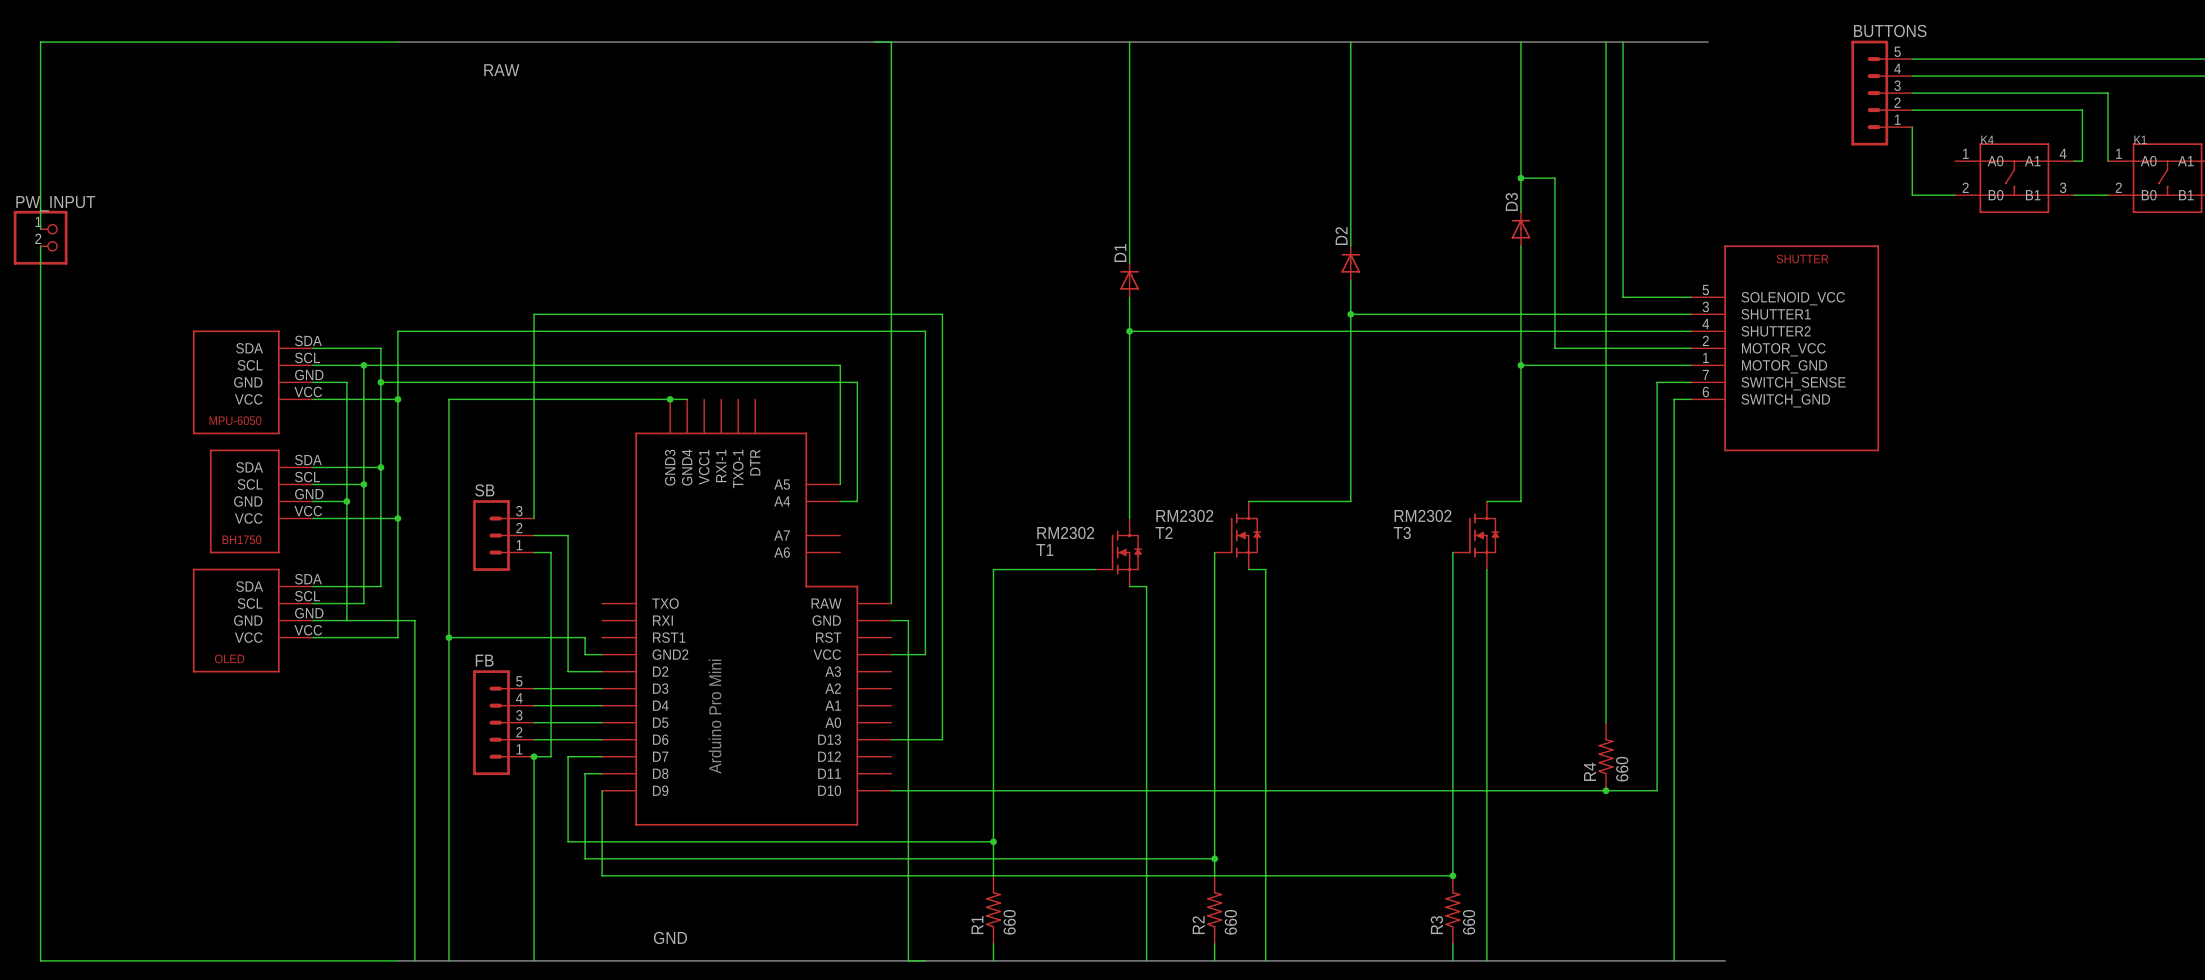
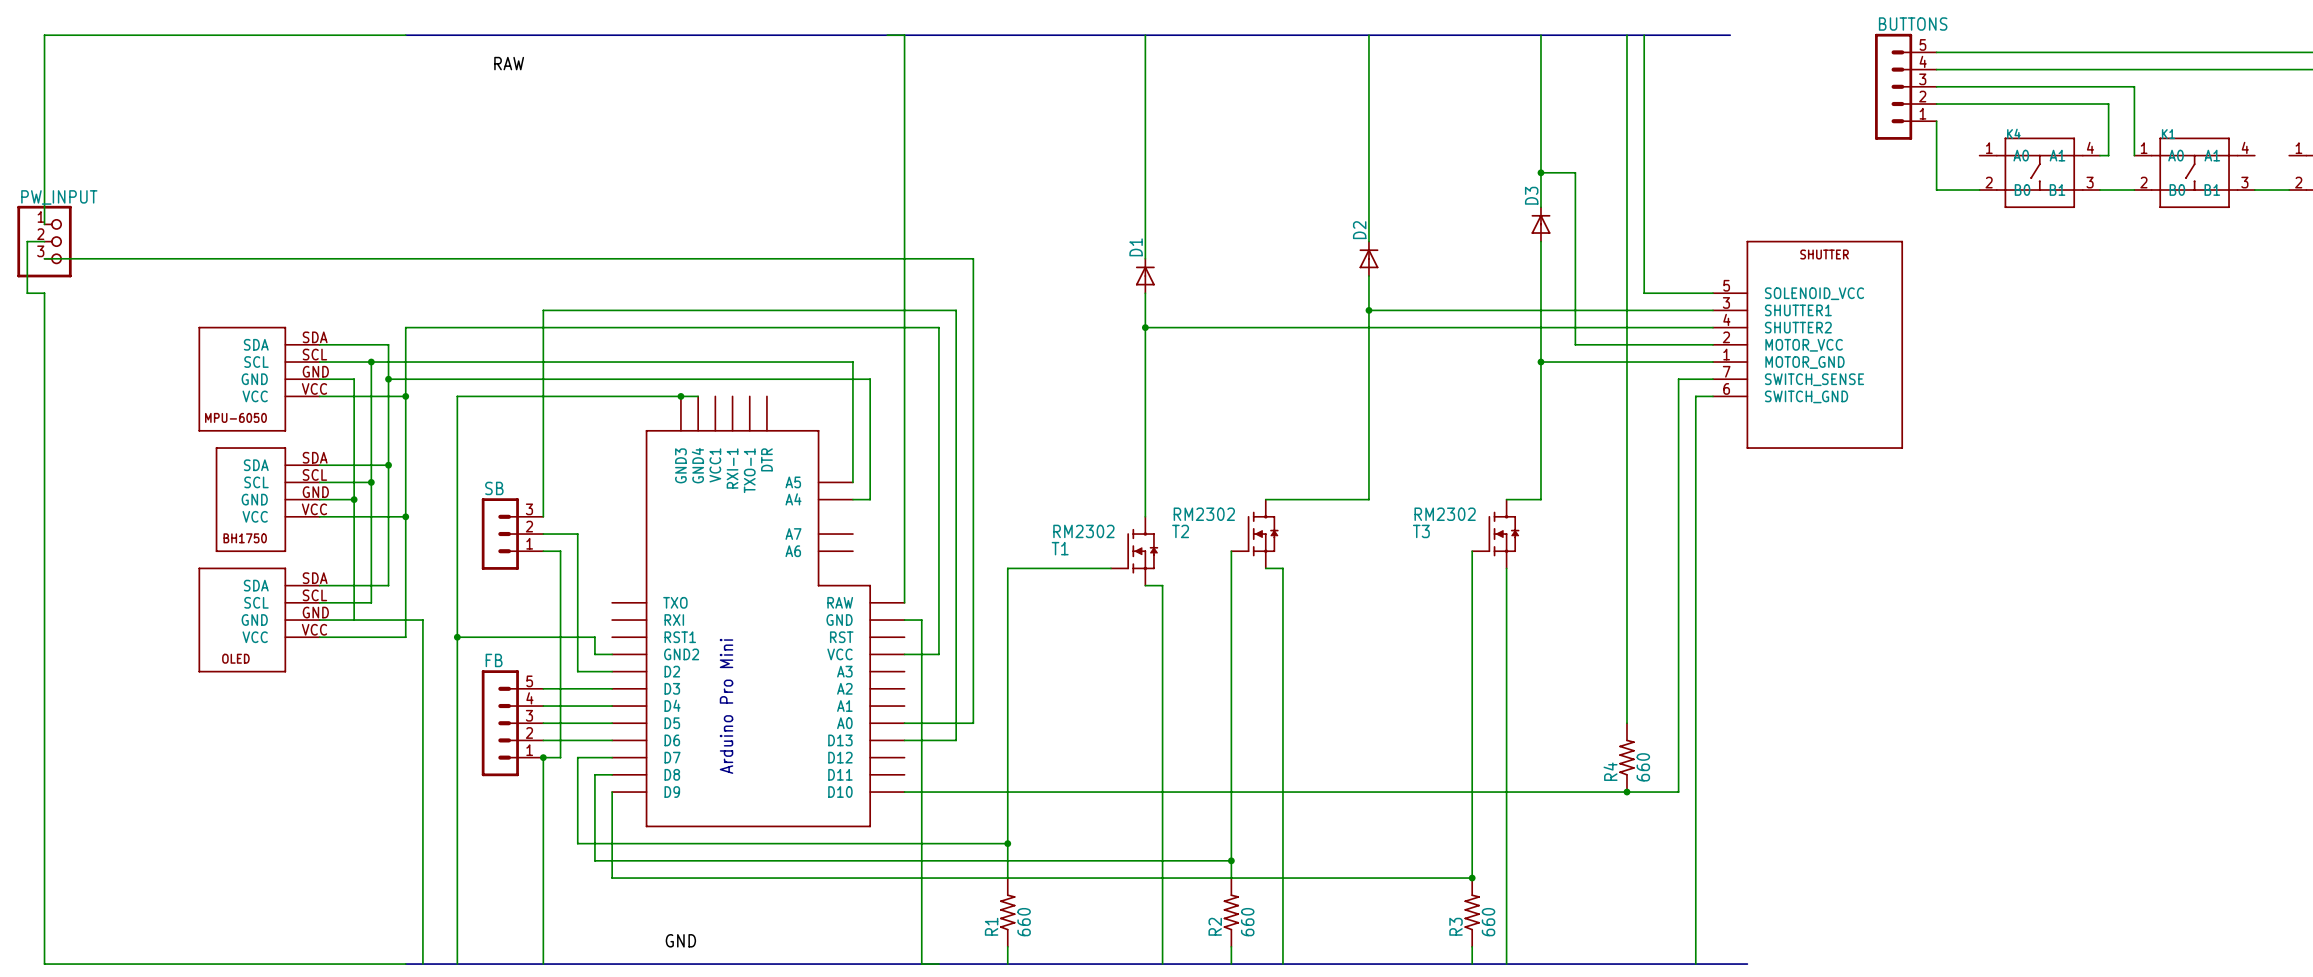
PW_INPUT: (40, 237) -> none
wire: (40, 246) (40, 297) -> (44, 241) (27, 241) (27, 293) (44, 293)
PW_INPUT: none -> (44, 241)
wire: none -> (44, 258) (973, 258) (973, 723) (904, 723)

